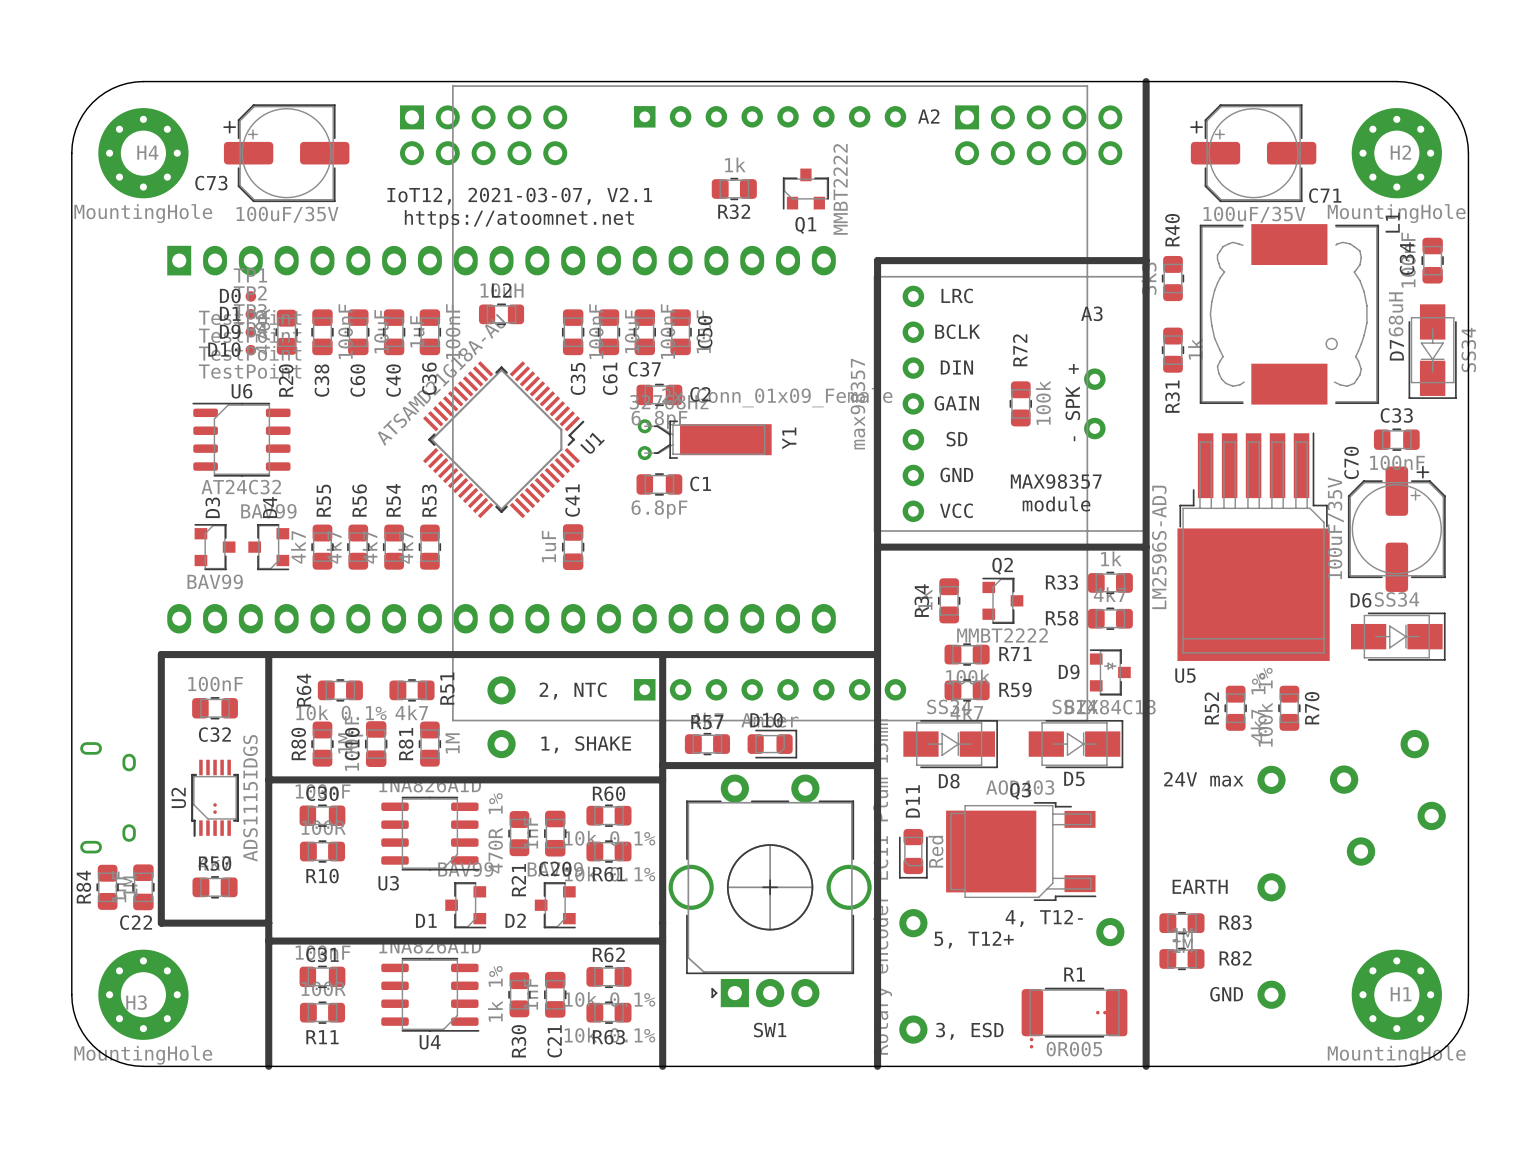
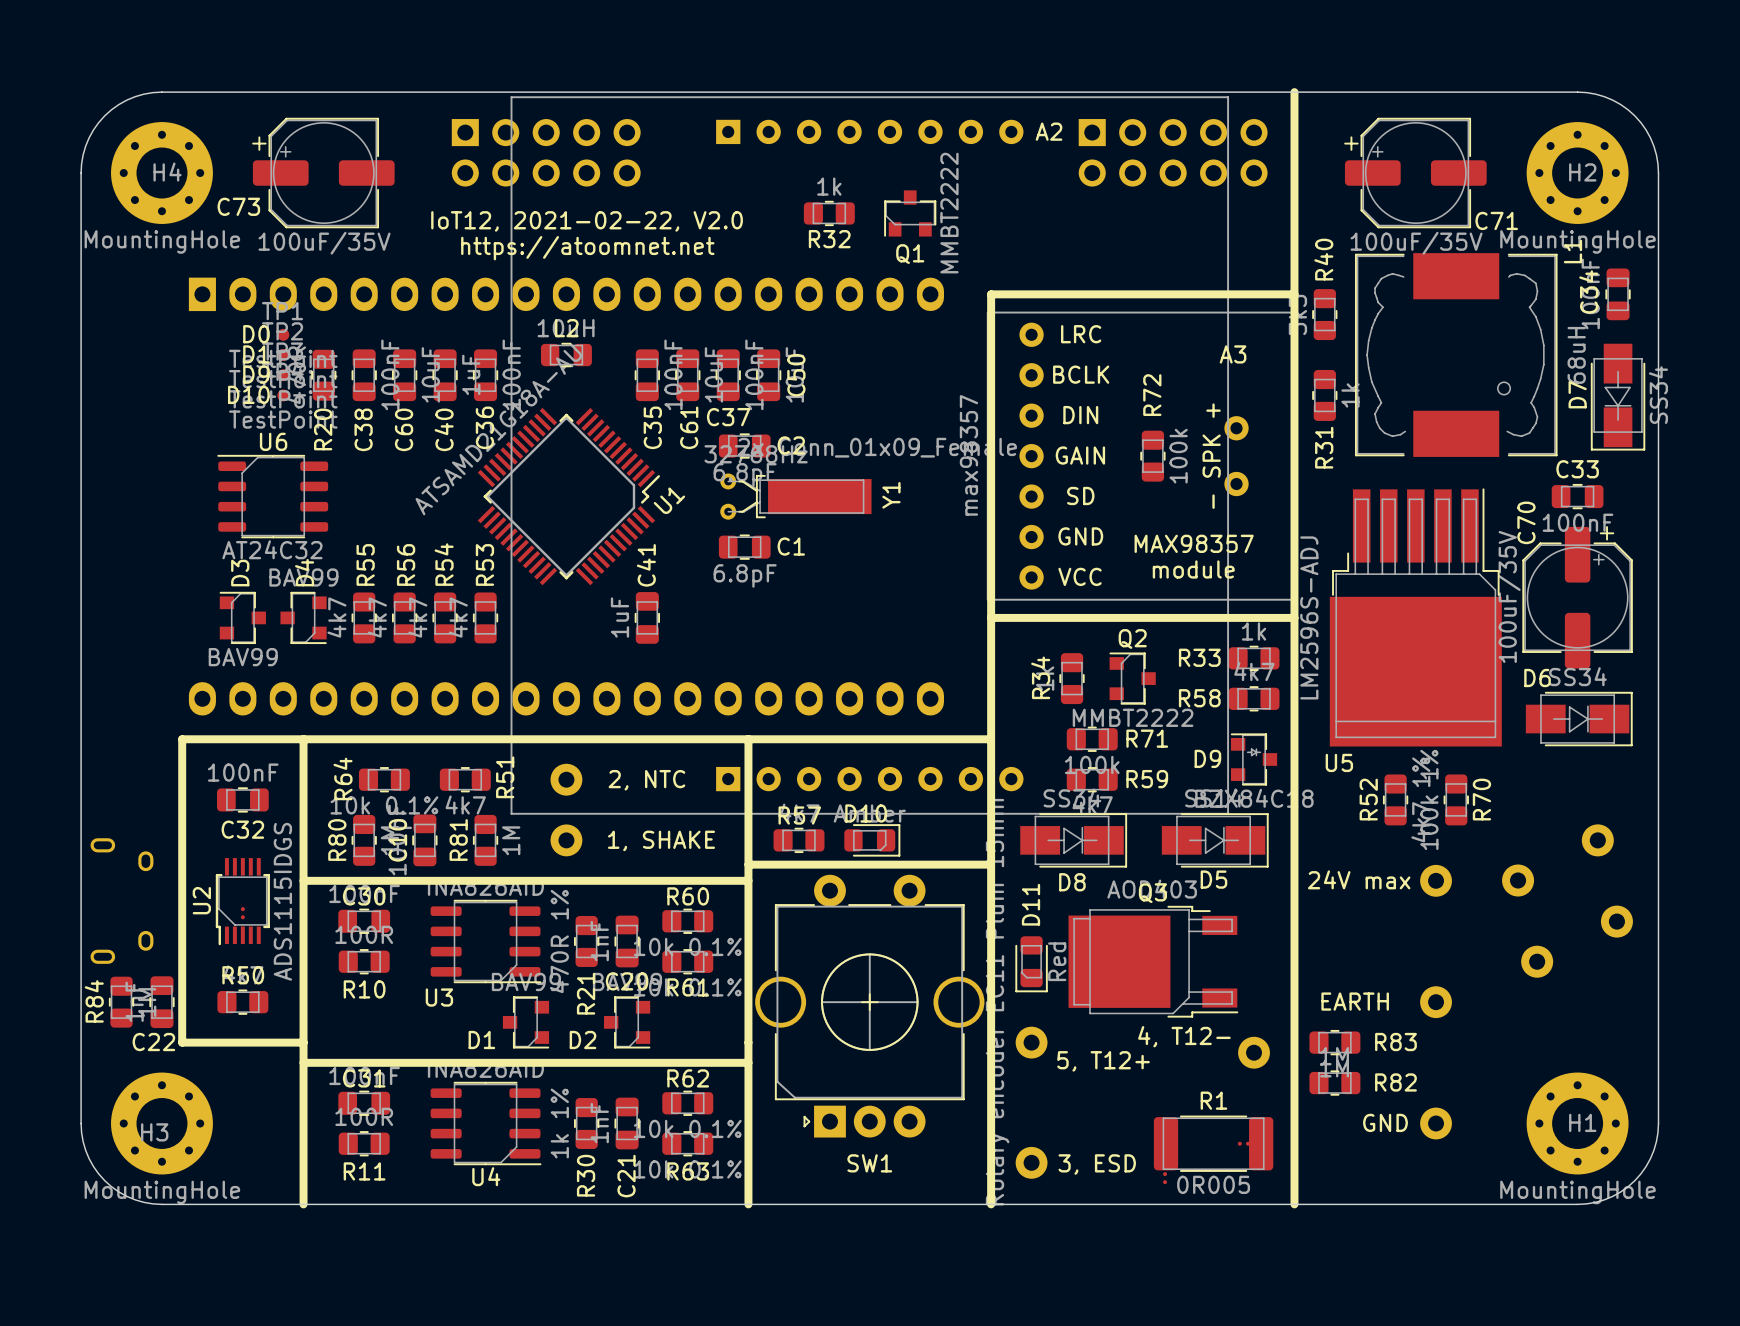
text: IoT12, 2021-03-07, V2.1 (519, 196) -> IoT12, 2021-02-22, V2.0 (587, 221)

